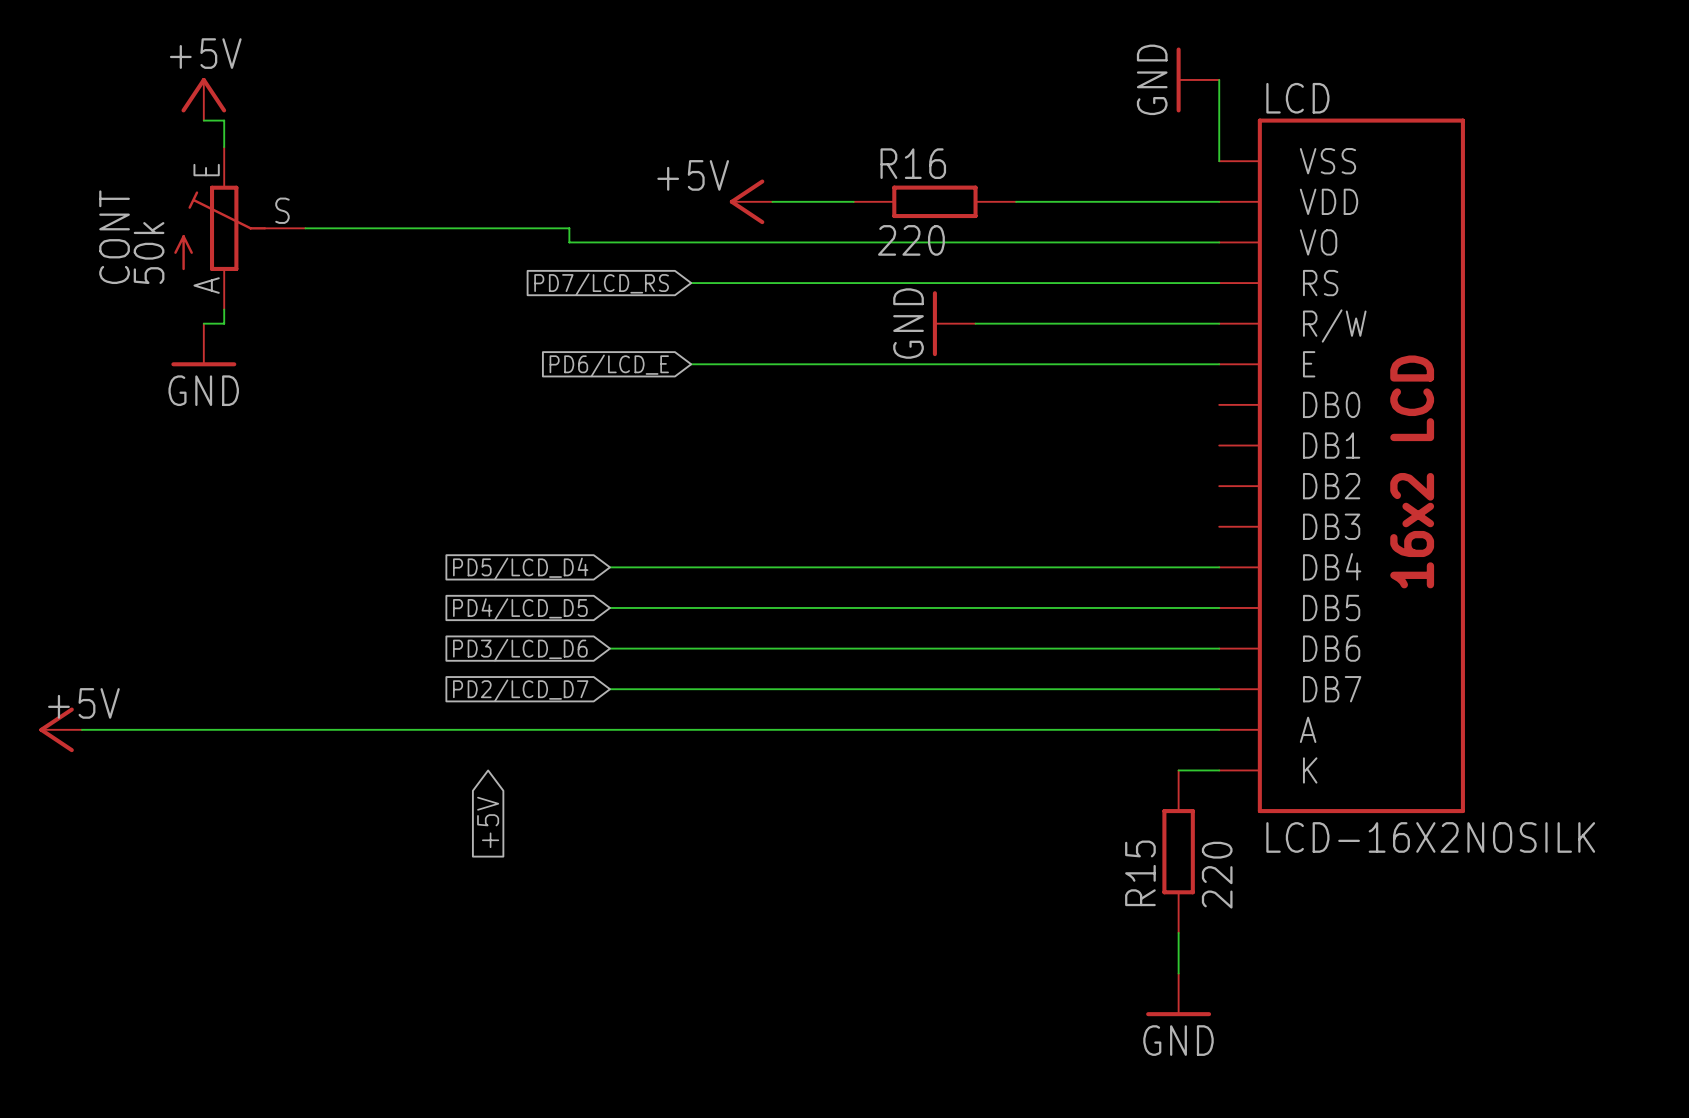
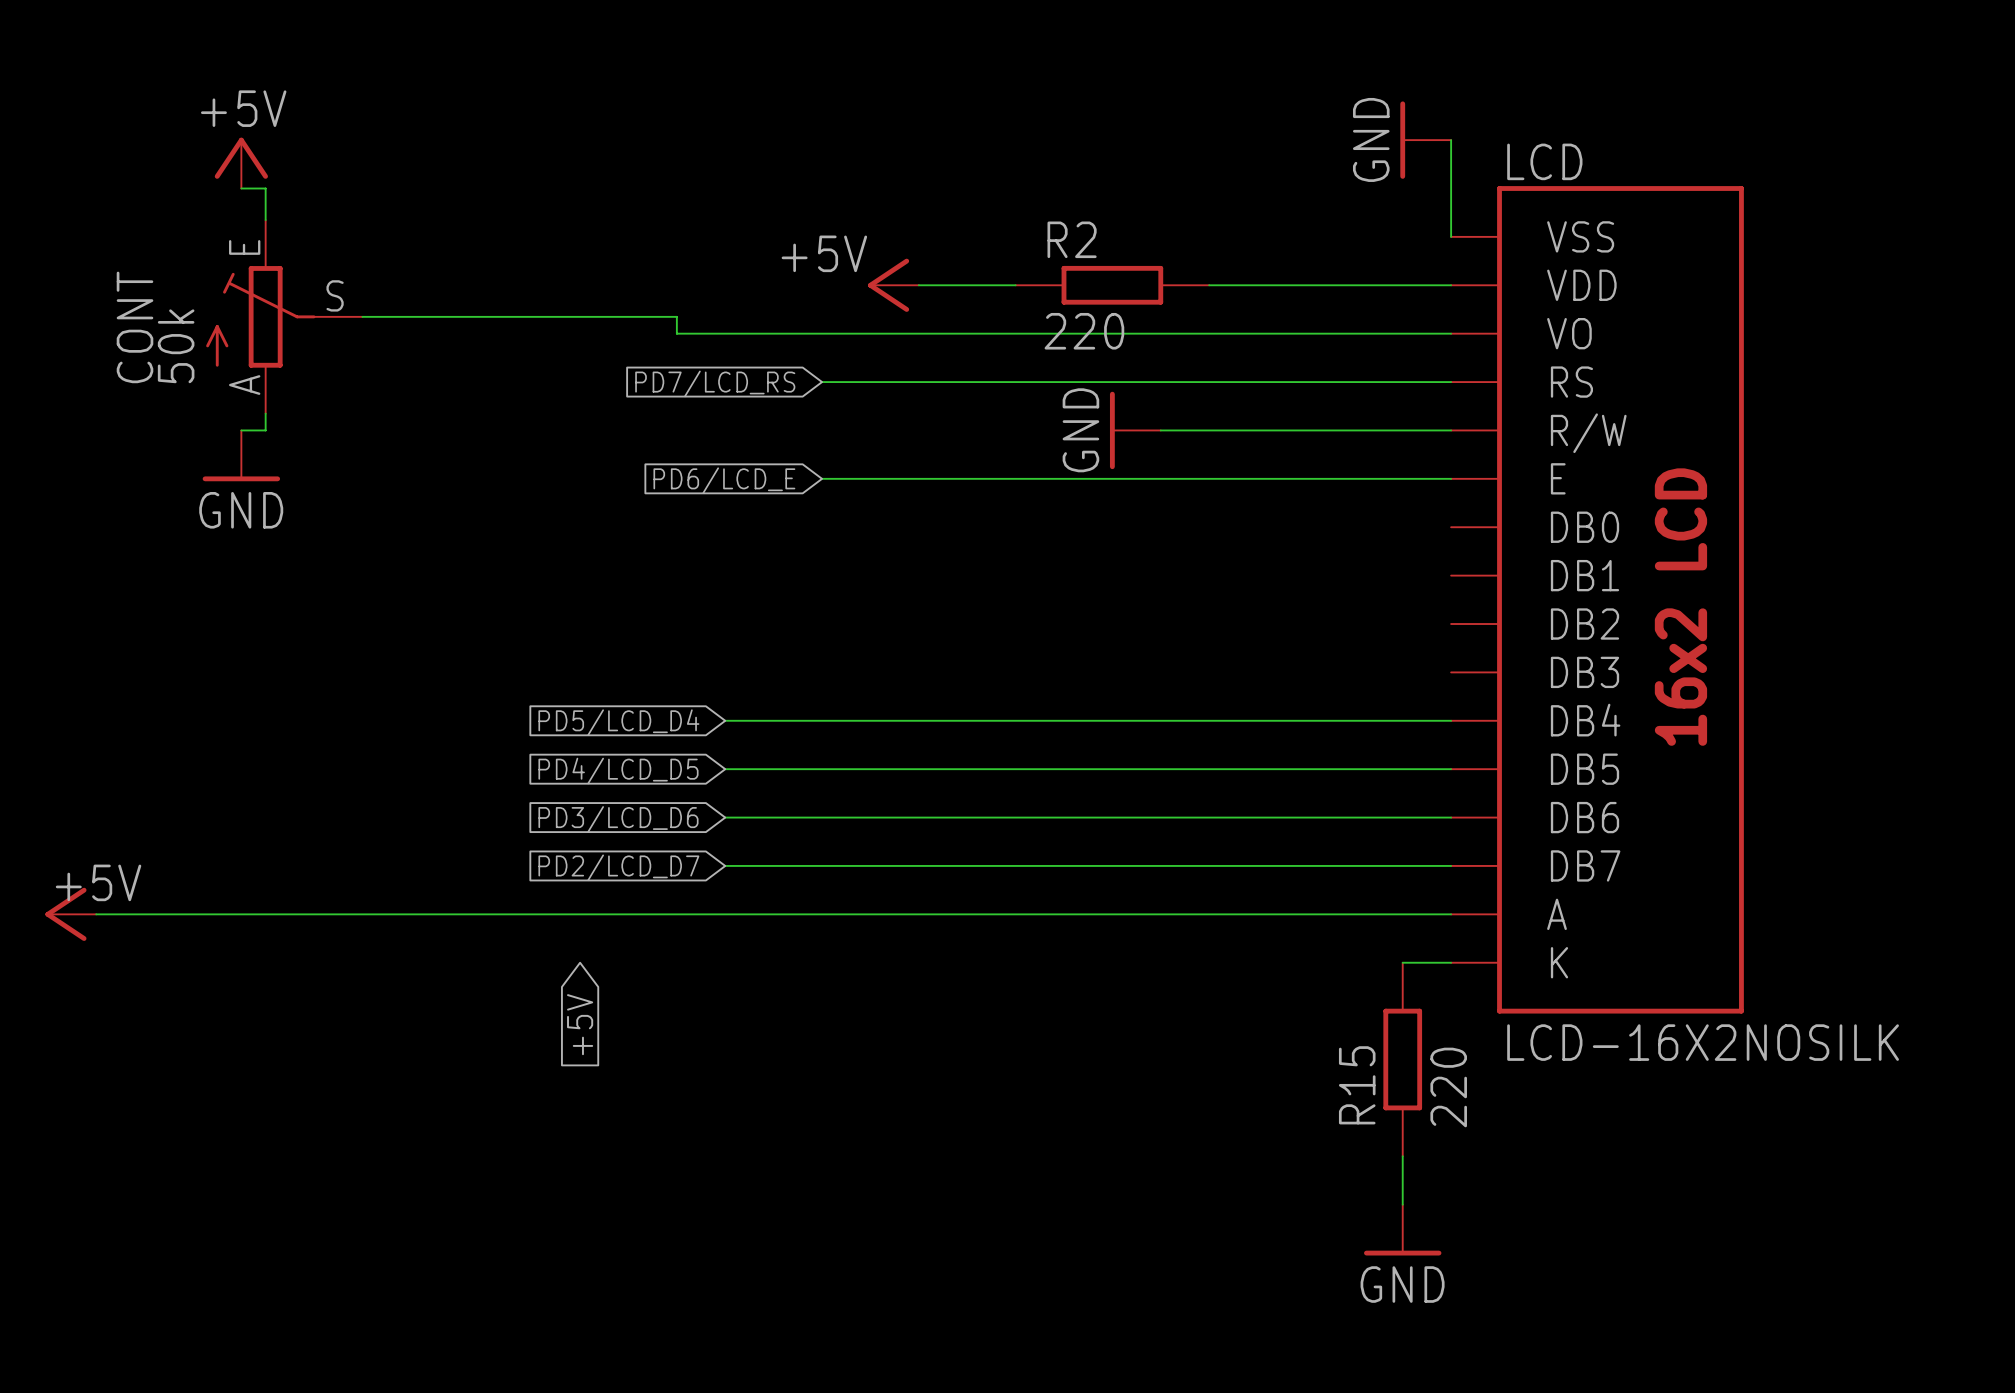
R16 name: R16 (913, 163) -> R2 (1072, 239)

